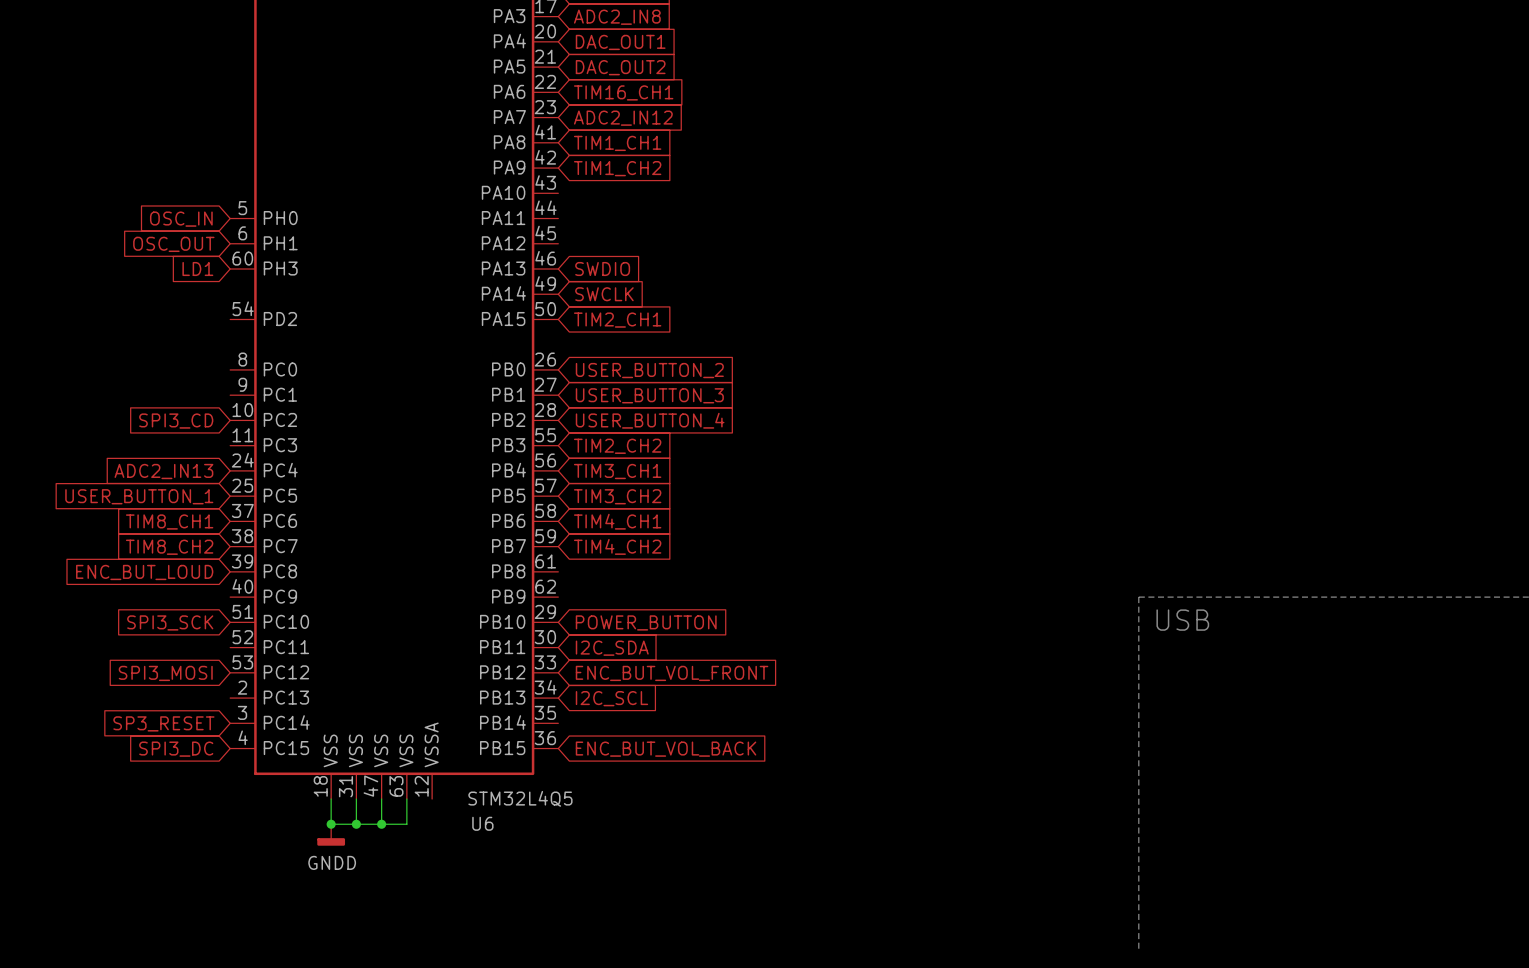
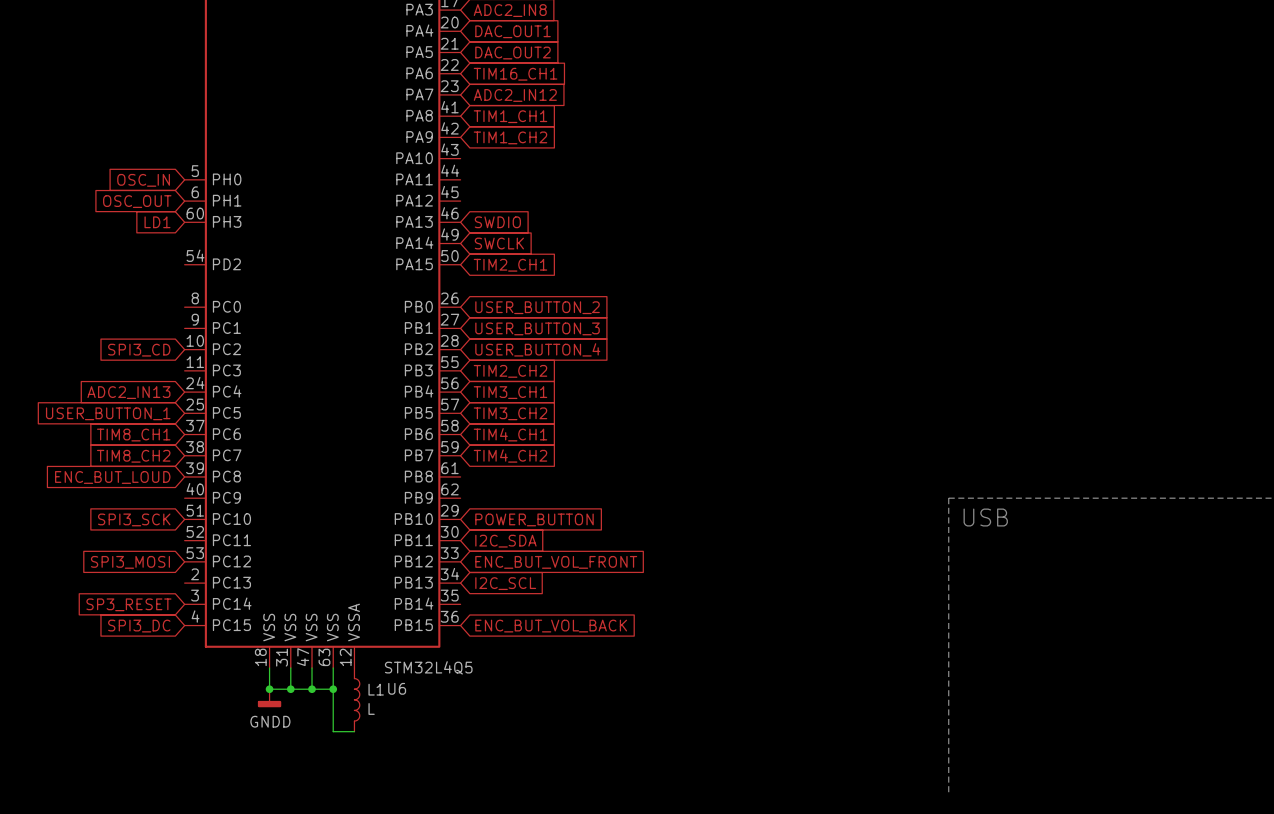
wire: none -> (333, 689) (333, 731) (354, 731)
junction: none -> (333, 689)
L1: none -> L (357, 699)

